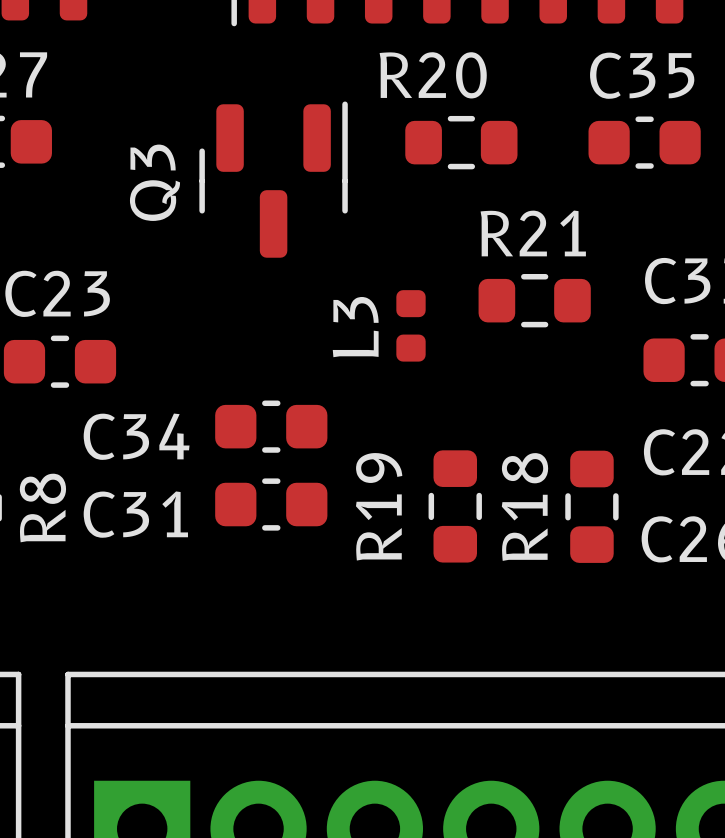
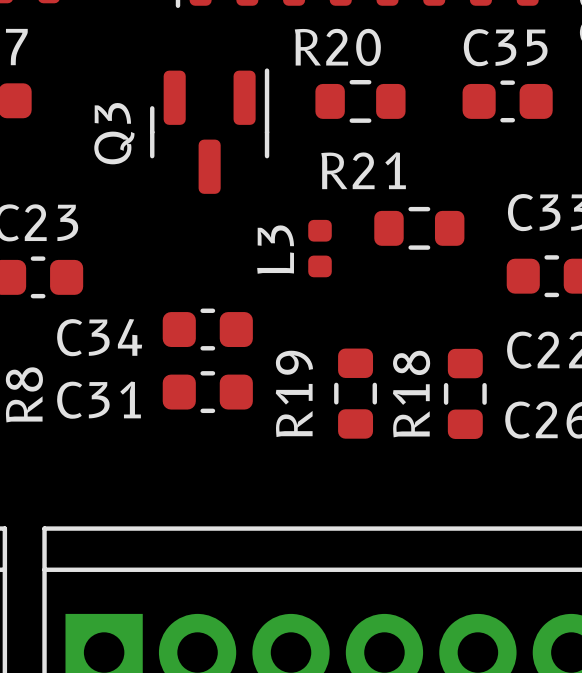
R21 name position: R21 (533, 233) -> R21 (363, 170)

